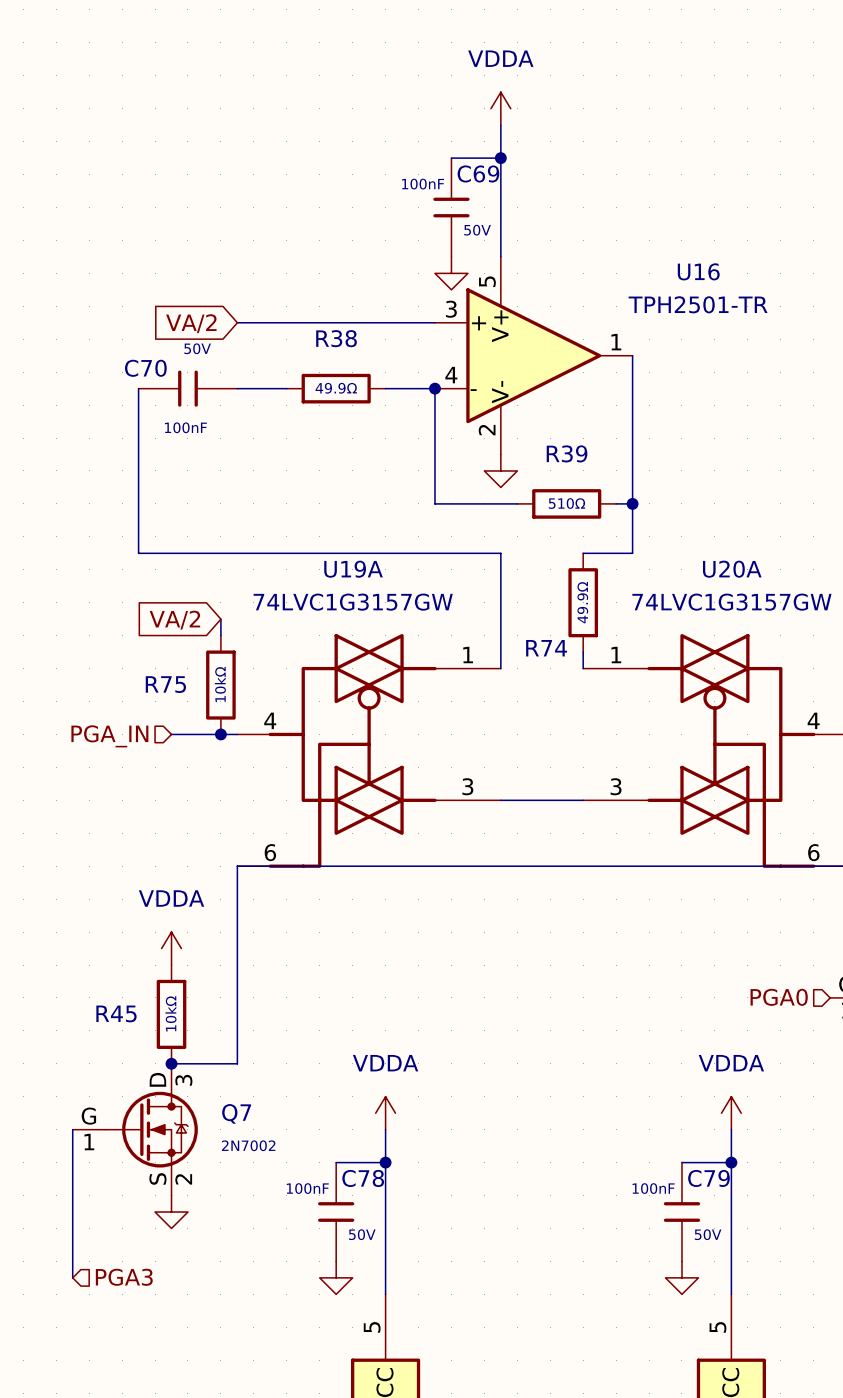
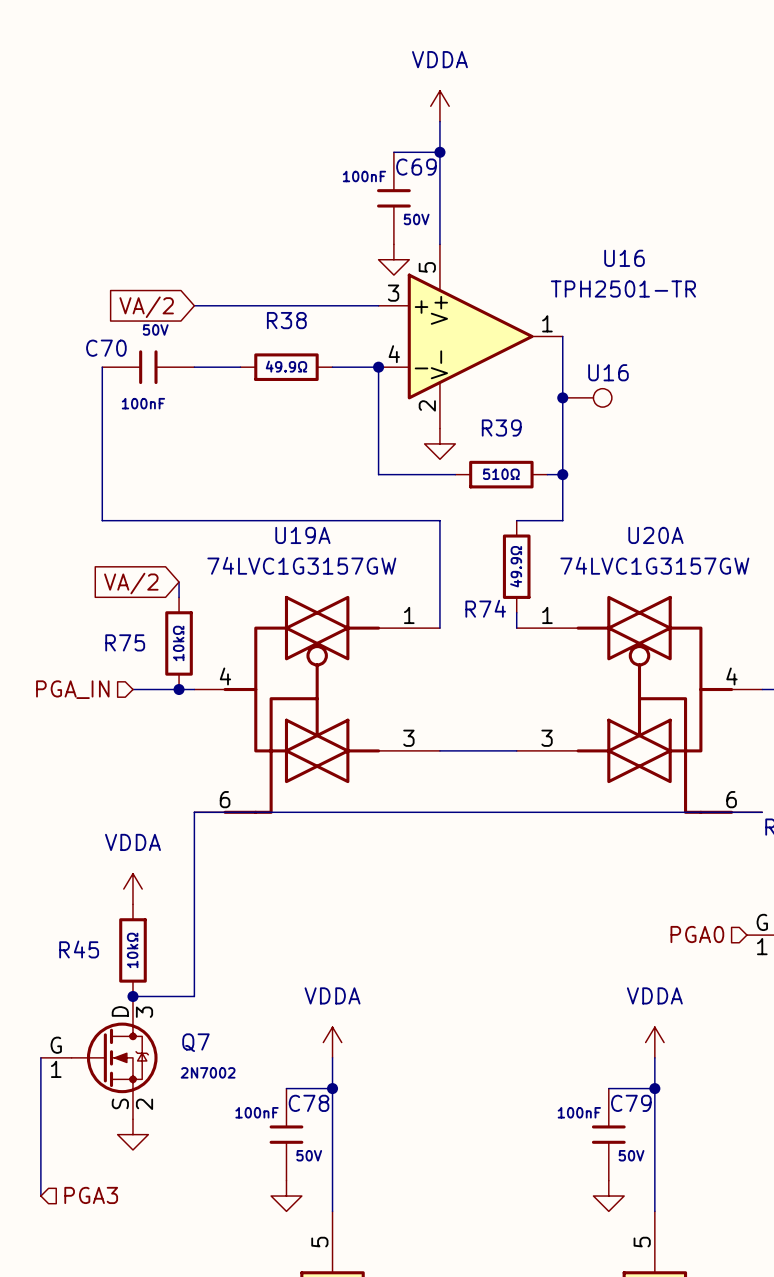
junction: none -> (562, 397)
part: none -> U16 (587, 397)

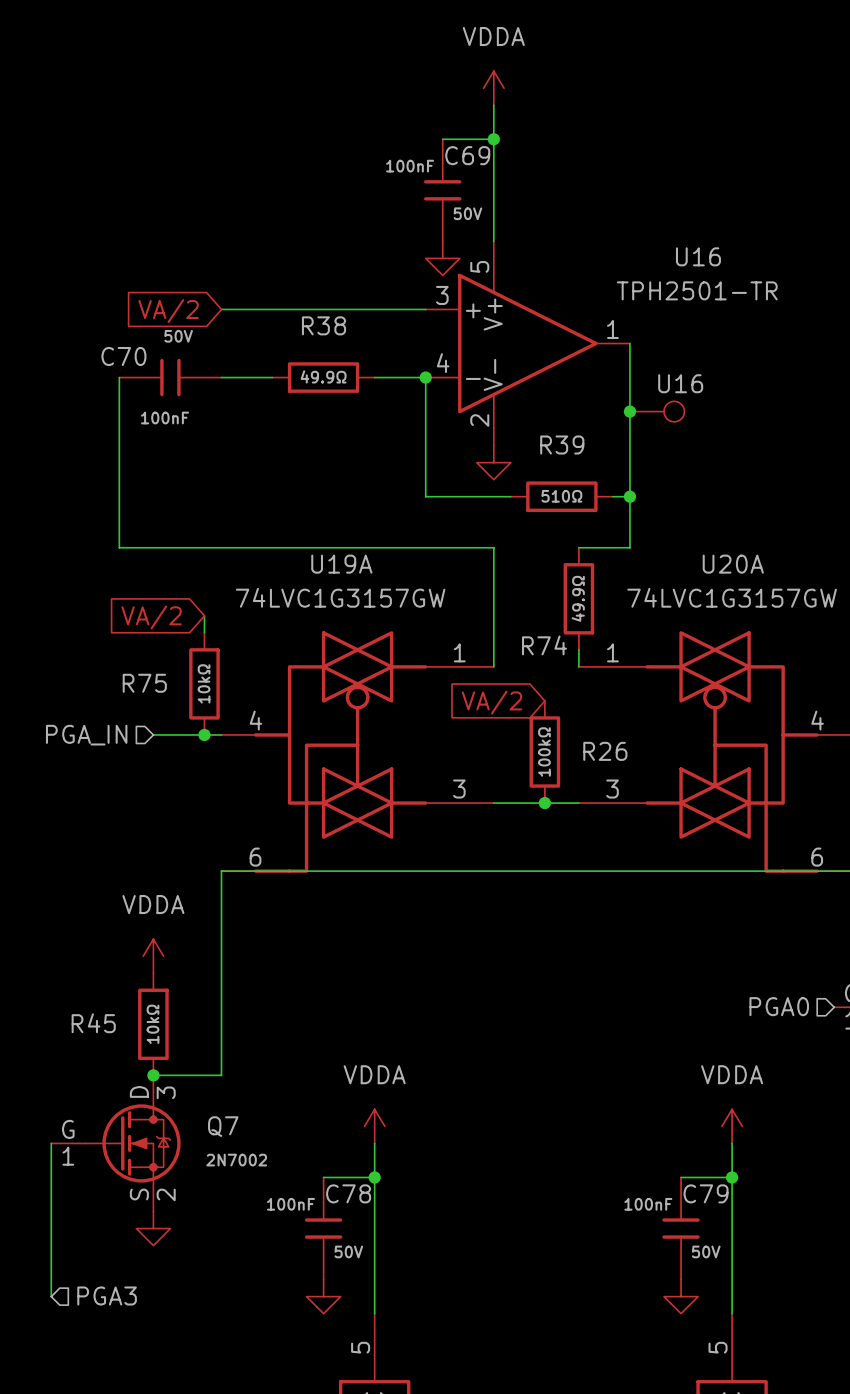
global label: none -> VA/2 (491, 702)
R26: none -> 100kΩ (544, 751)
junction: none -> (544, 803)

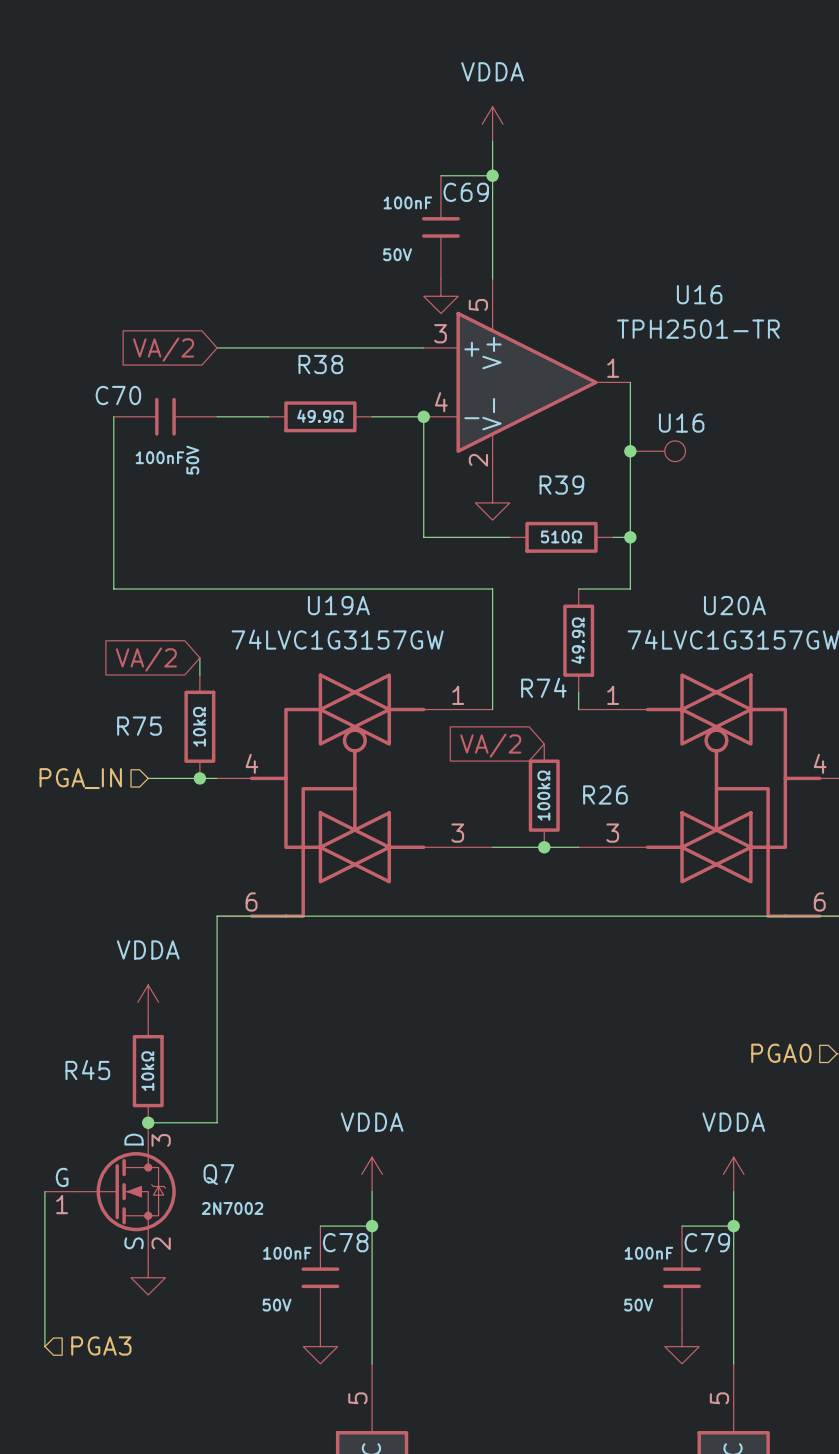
C69 text position: 50V (467, 213) -> 50V (397, 254)
C70 text rotation: 0° (178, 336) -> 90° counterclockwise (192, 460)
C70 text position: 50V (178, 336) -> 50V (192, 460)
C78 text position: 50V (348, 1251) -> 50V (277, 1305)
C79 text position: 50V (706, 1251) -> 50V (638, 1305)

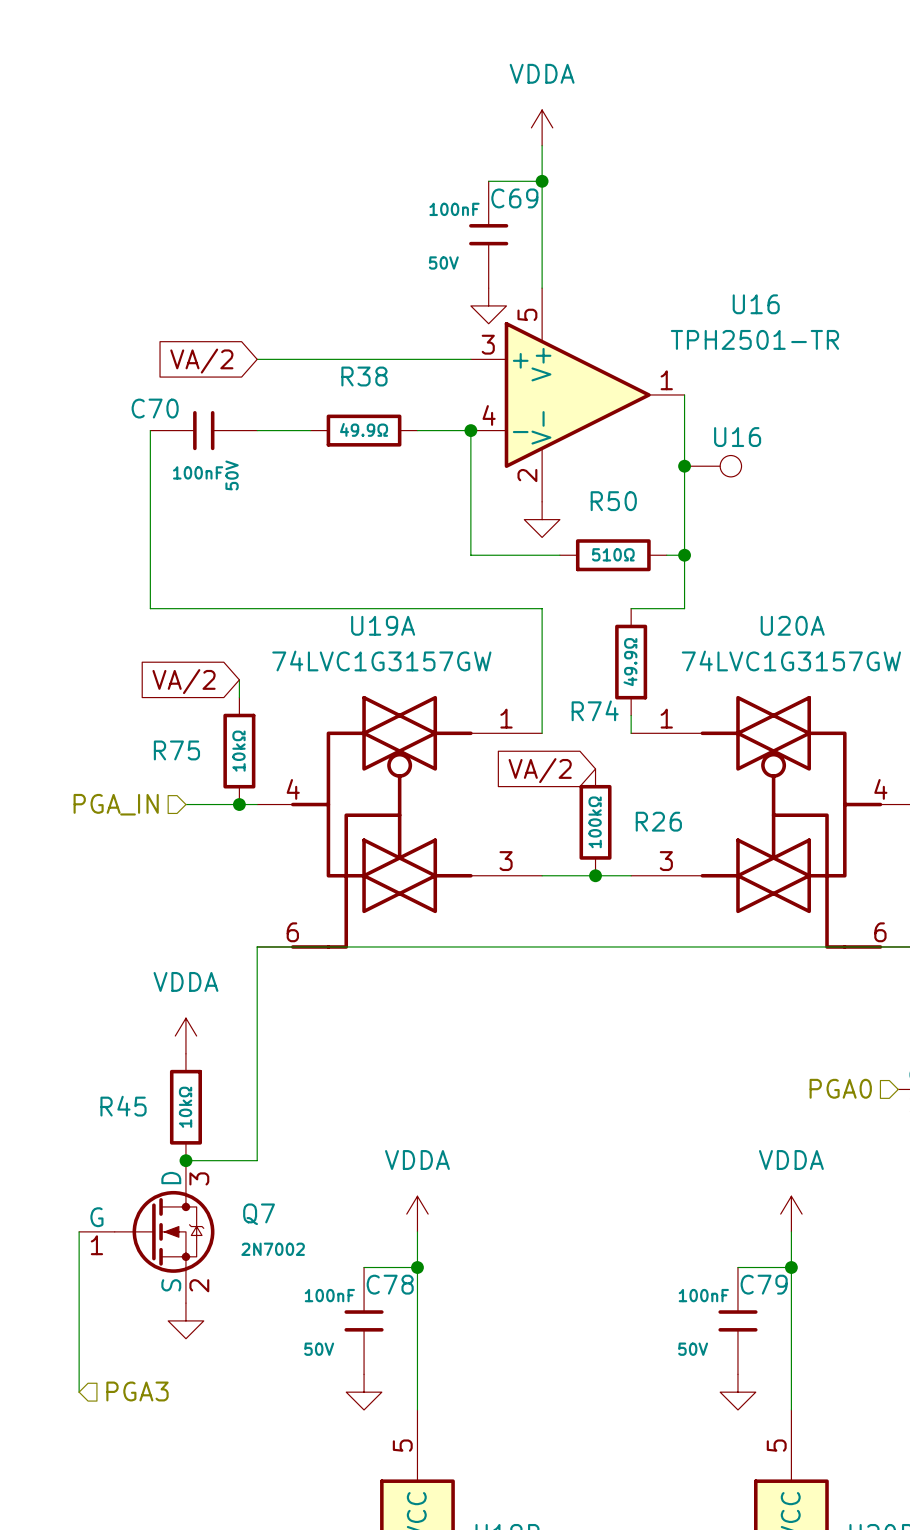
R39 name: R39 (561, 485) -> R50 (613, 501)

